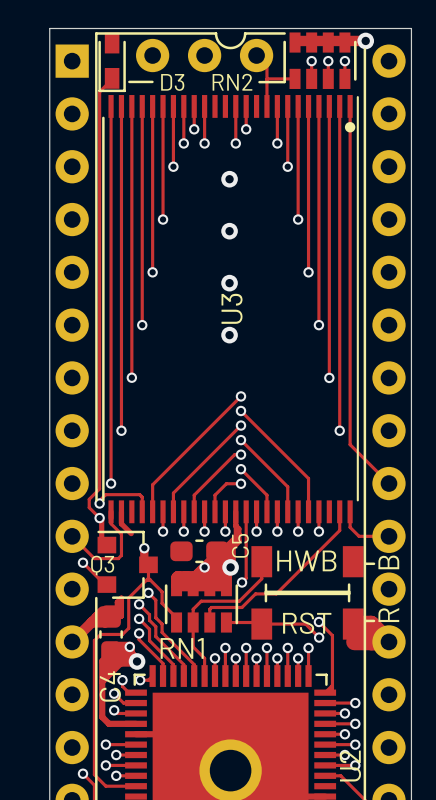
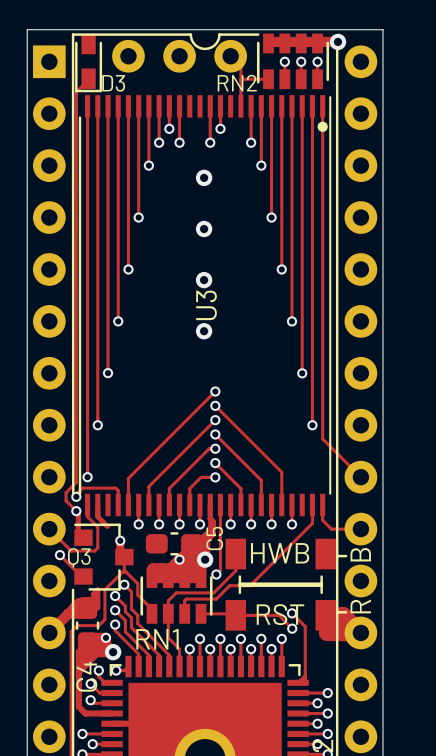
line: (129, 81) (152, 81) -> none
D3 name position: D3 (172, 82) -> D3 (113, 83)
RN2 name position: RN2 (232, 82) -> RN2 (237, 83)
line: (259, 82) (284, 82) -> none

